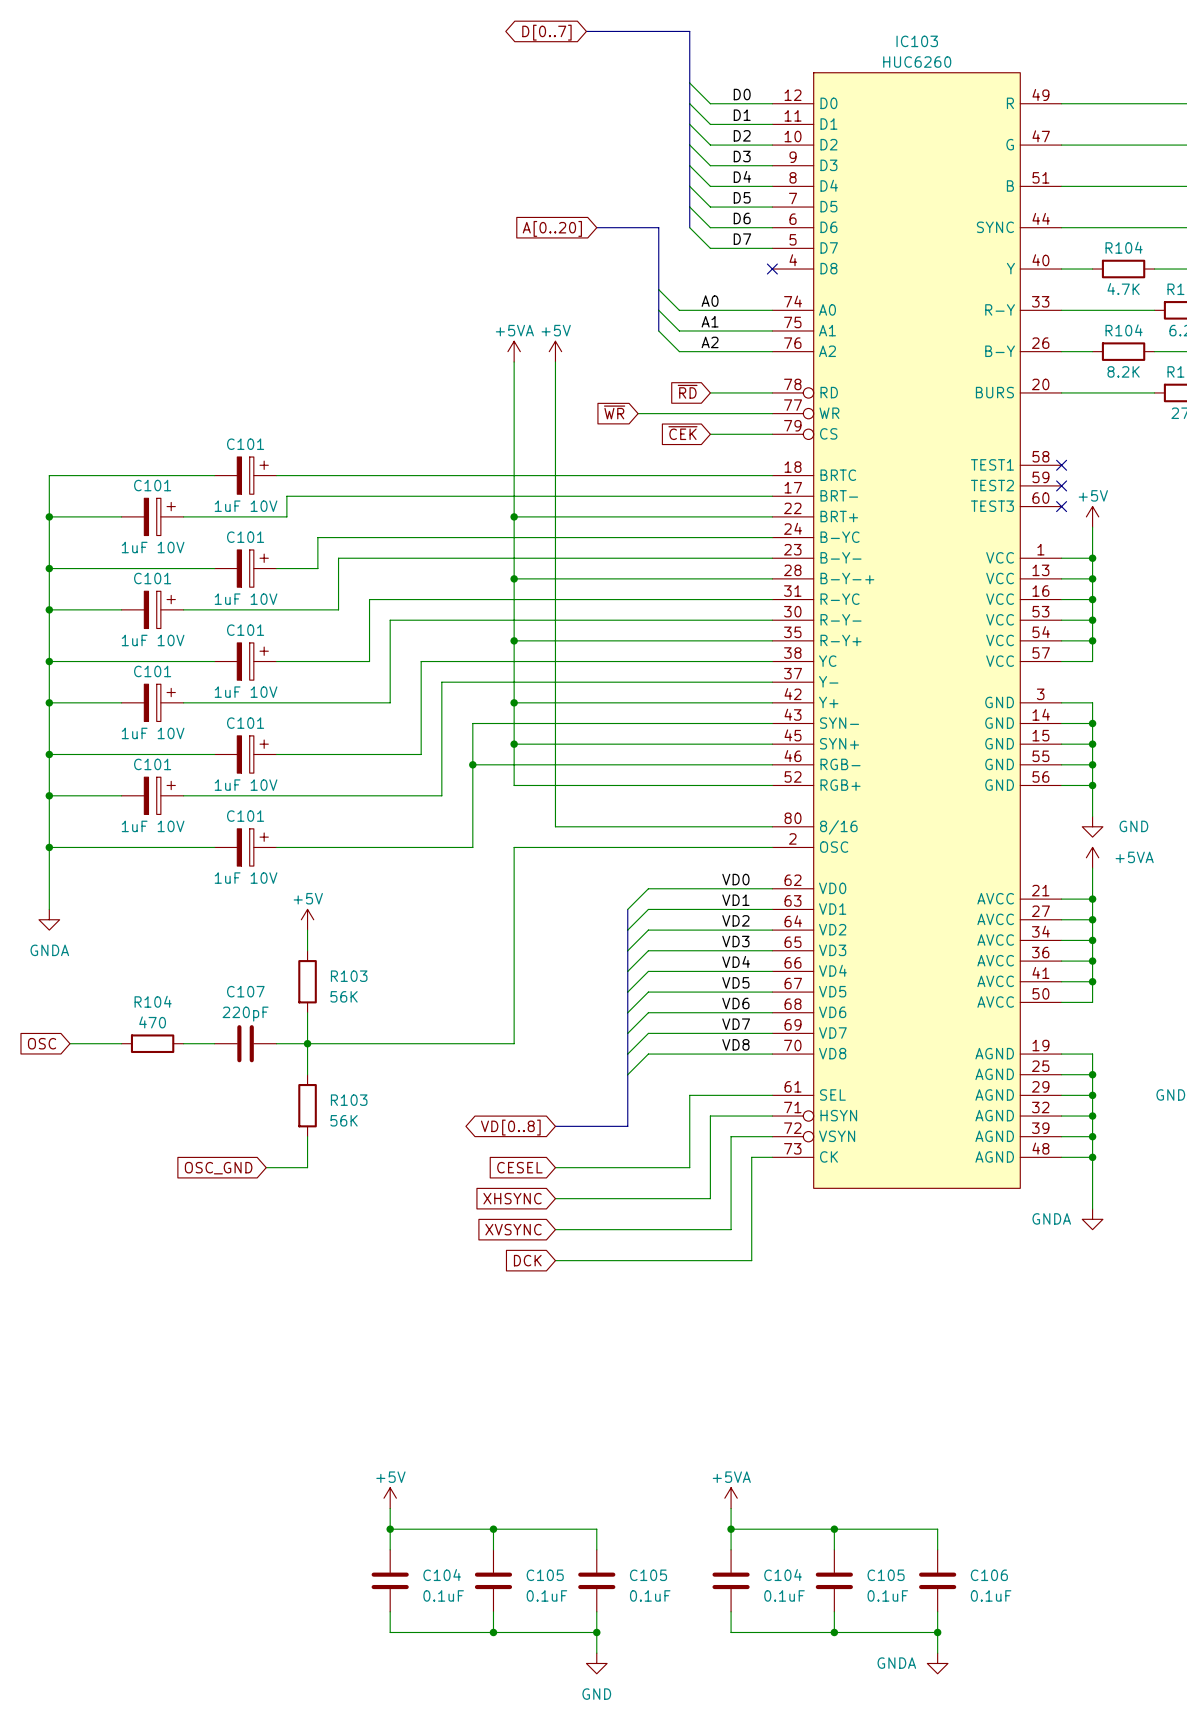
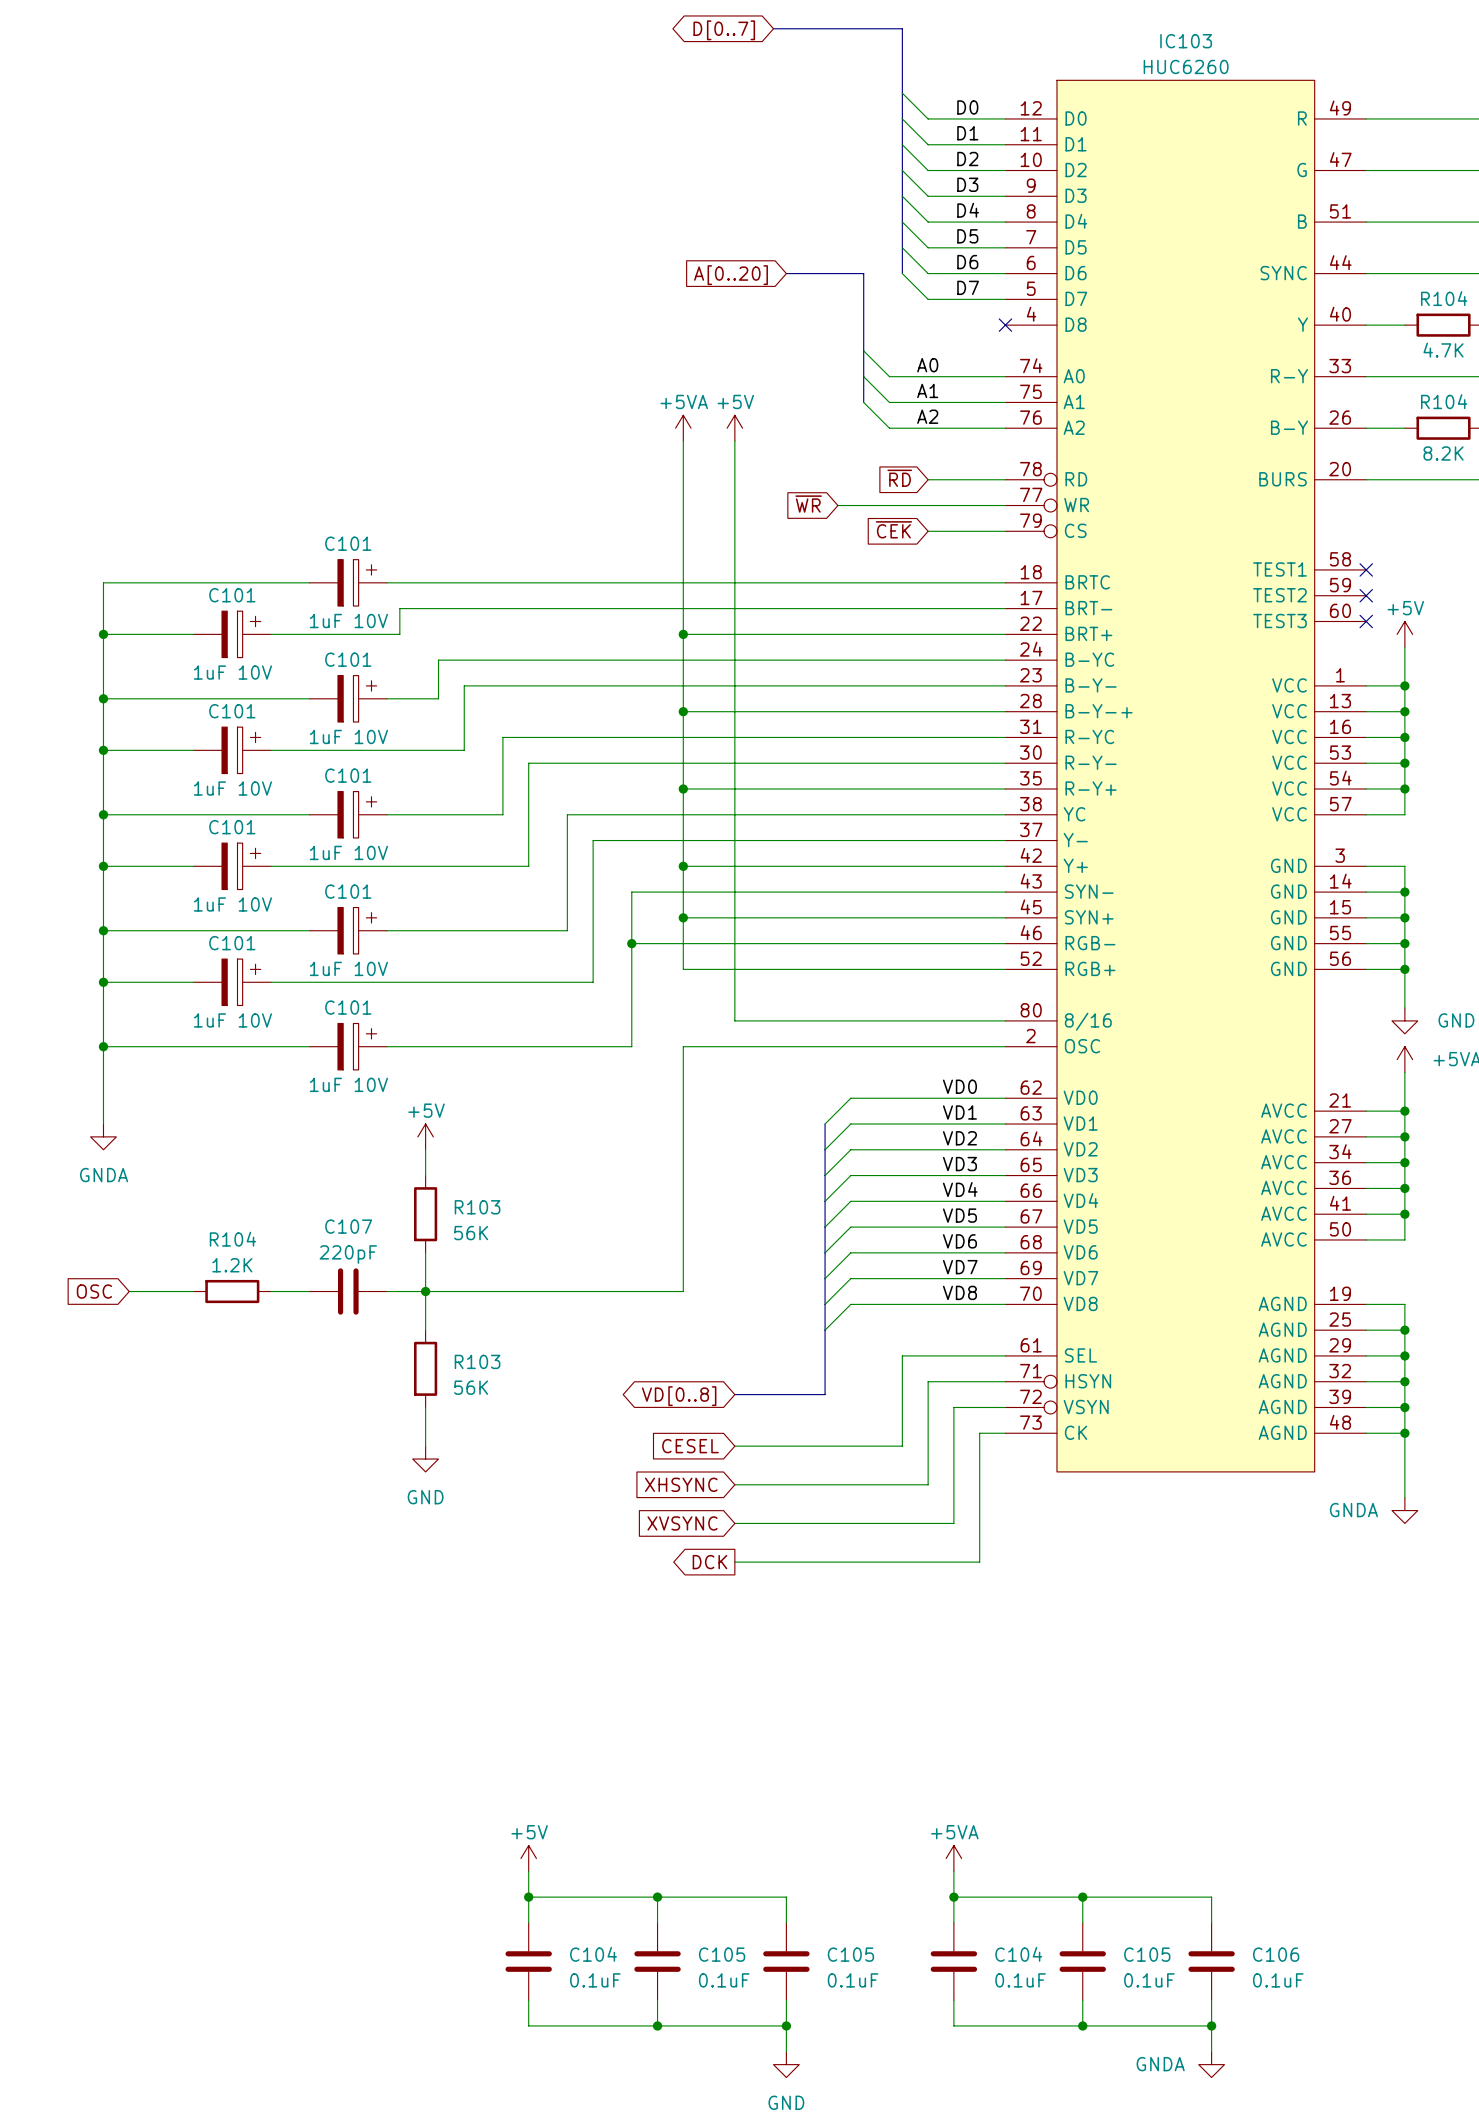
R104 value: 470 (152, 1022) -> 1.2K (232, 1265)
wire: (266, 1167) (307, 1167) -> none
global label: OSC_GND (218, 1168) -> none
power symbol: none -> GND (425, 1459)
global label shape: input (527, 1260) -> output (709, 1562)

